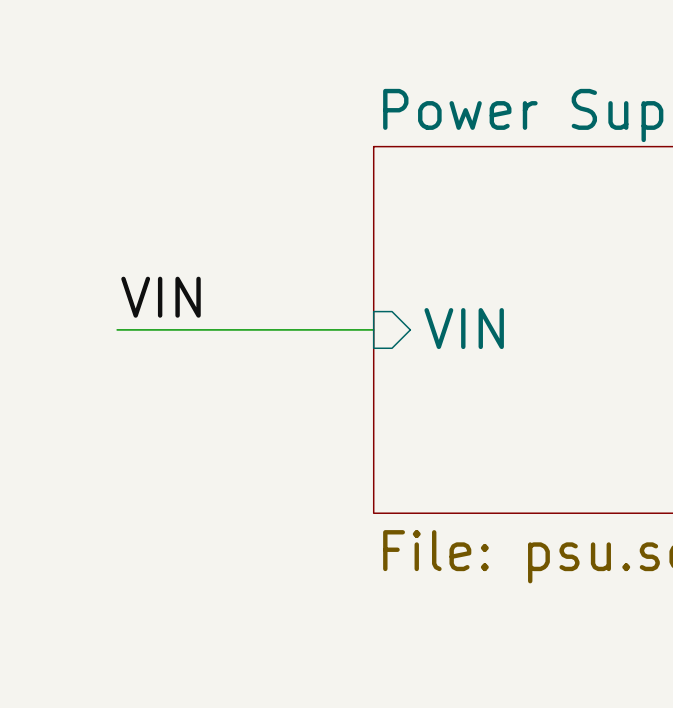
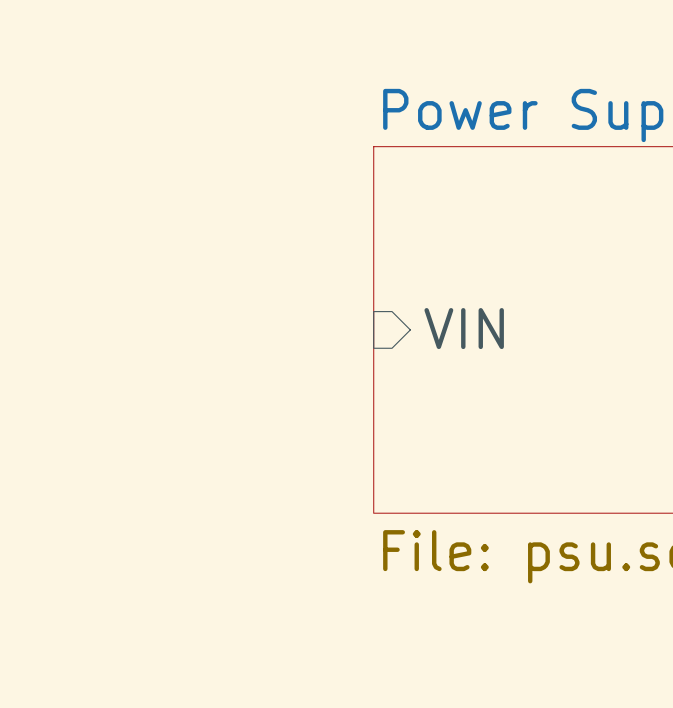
label: VIN (161, 297) -> none
wire: (117, 329) (373, 329) -> none

